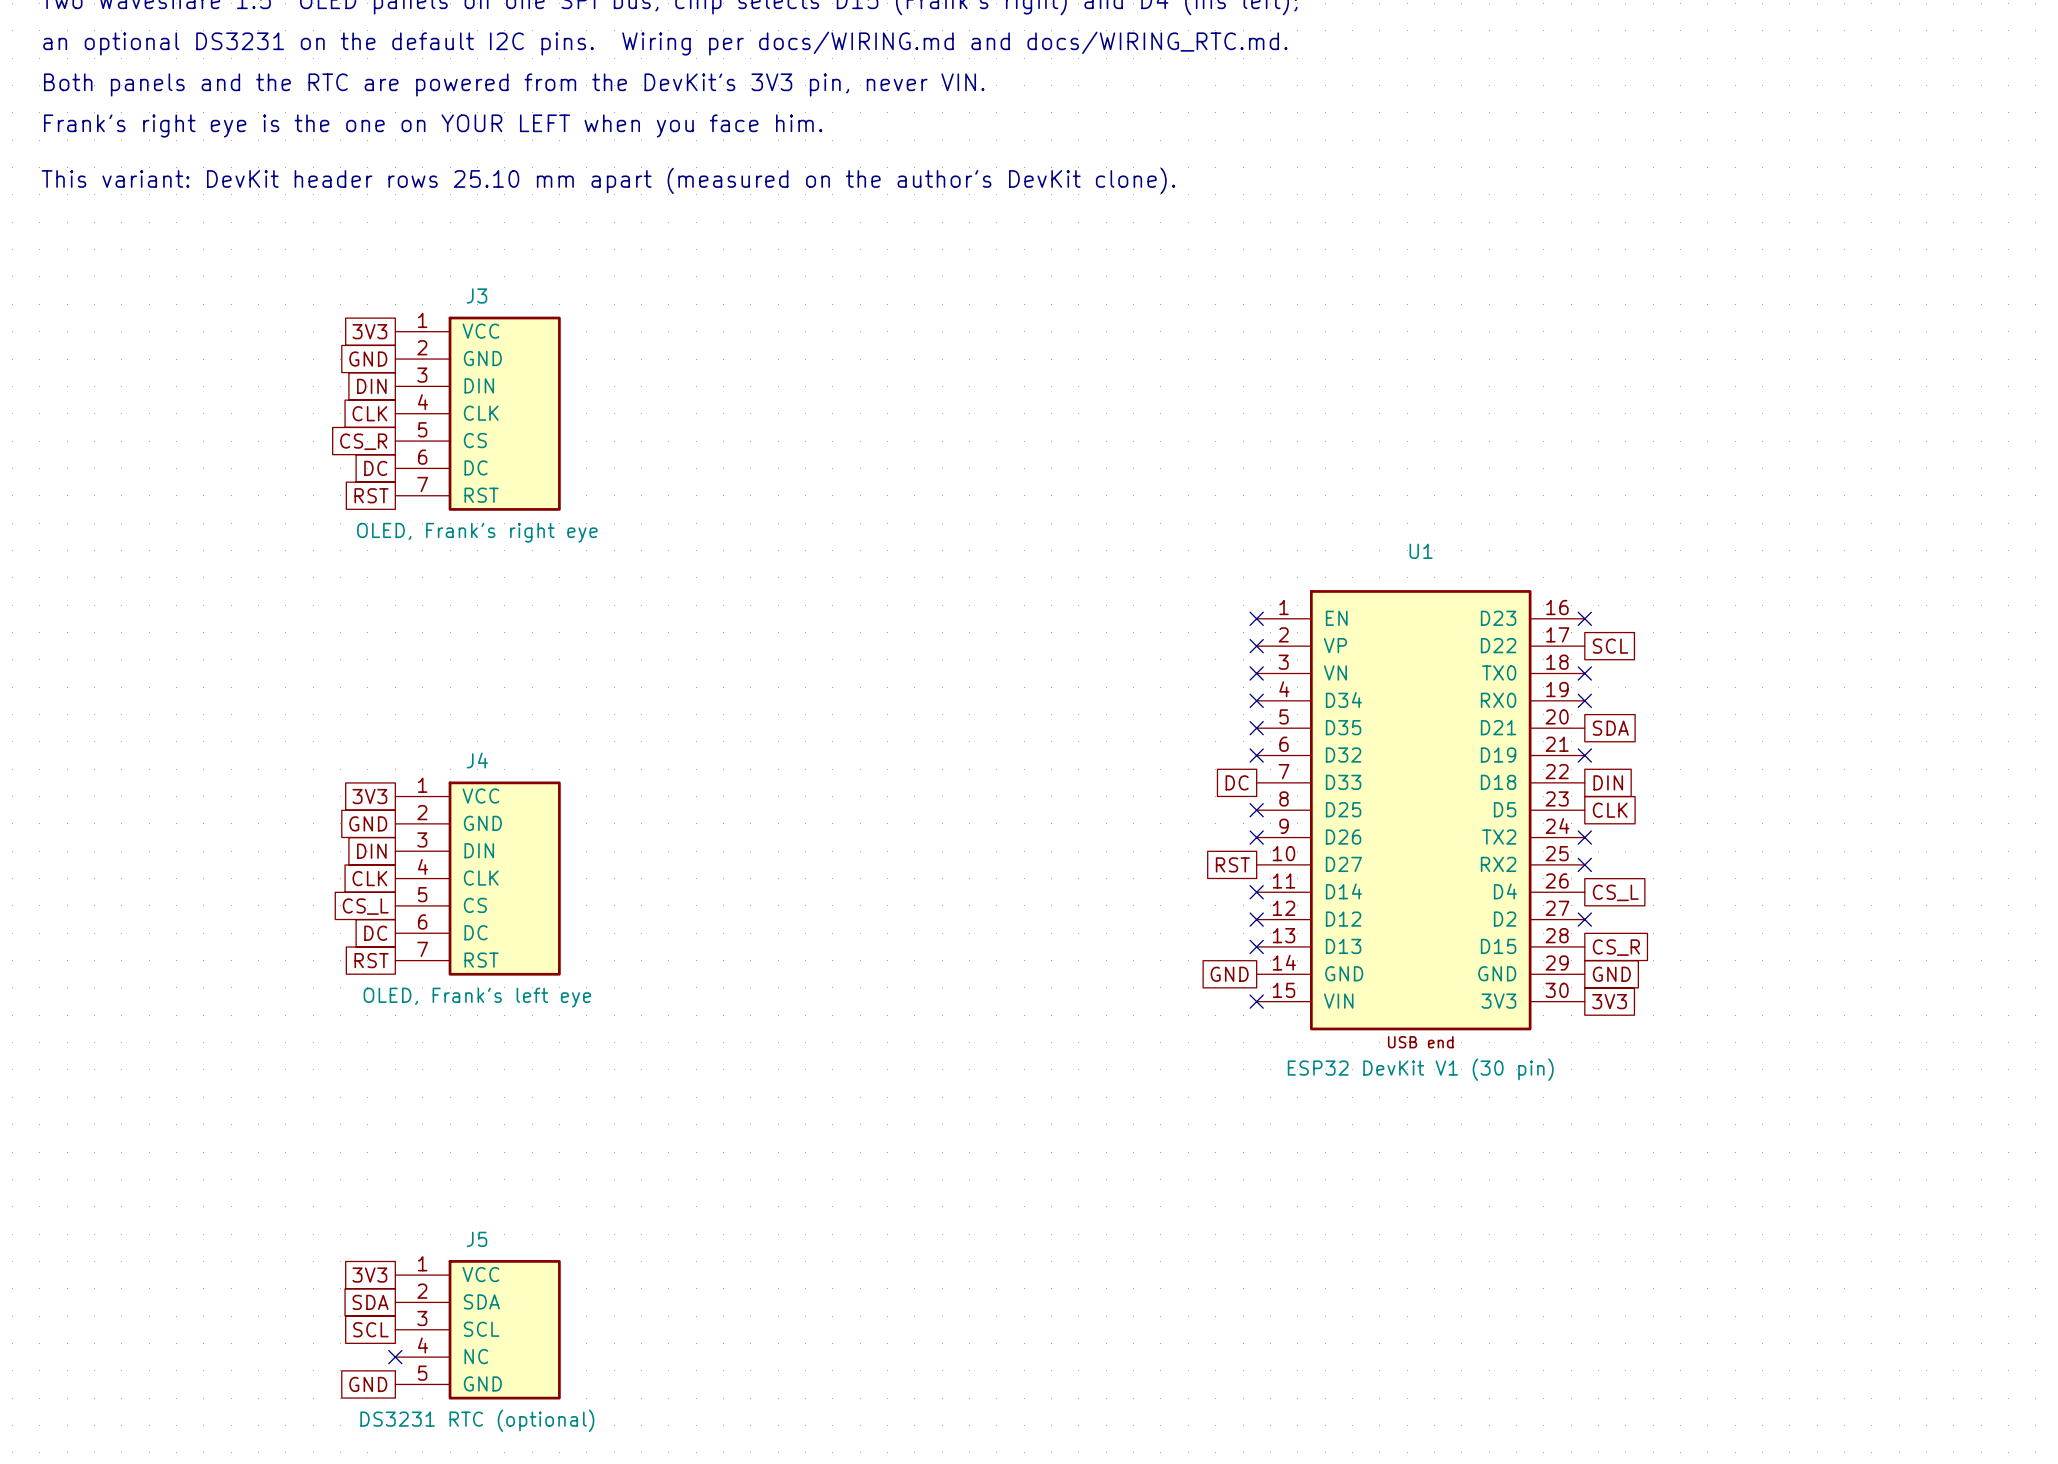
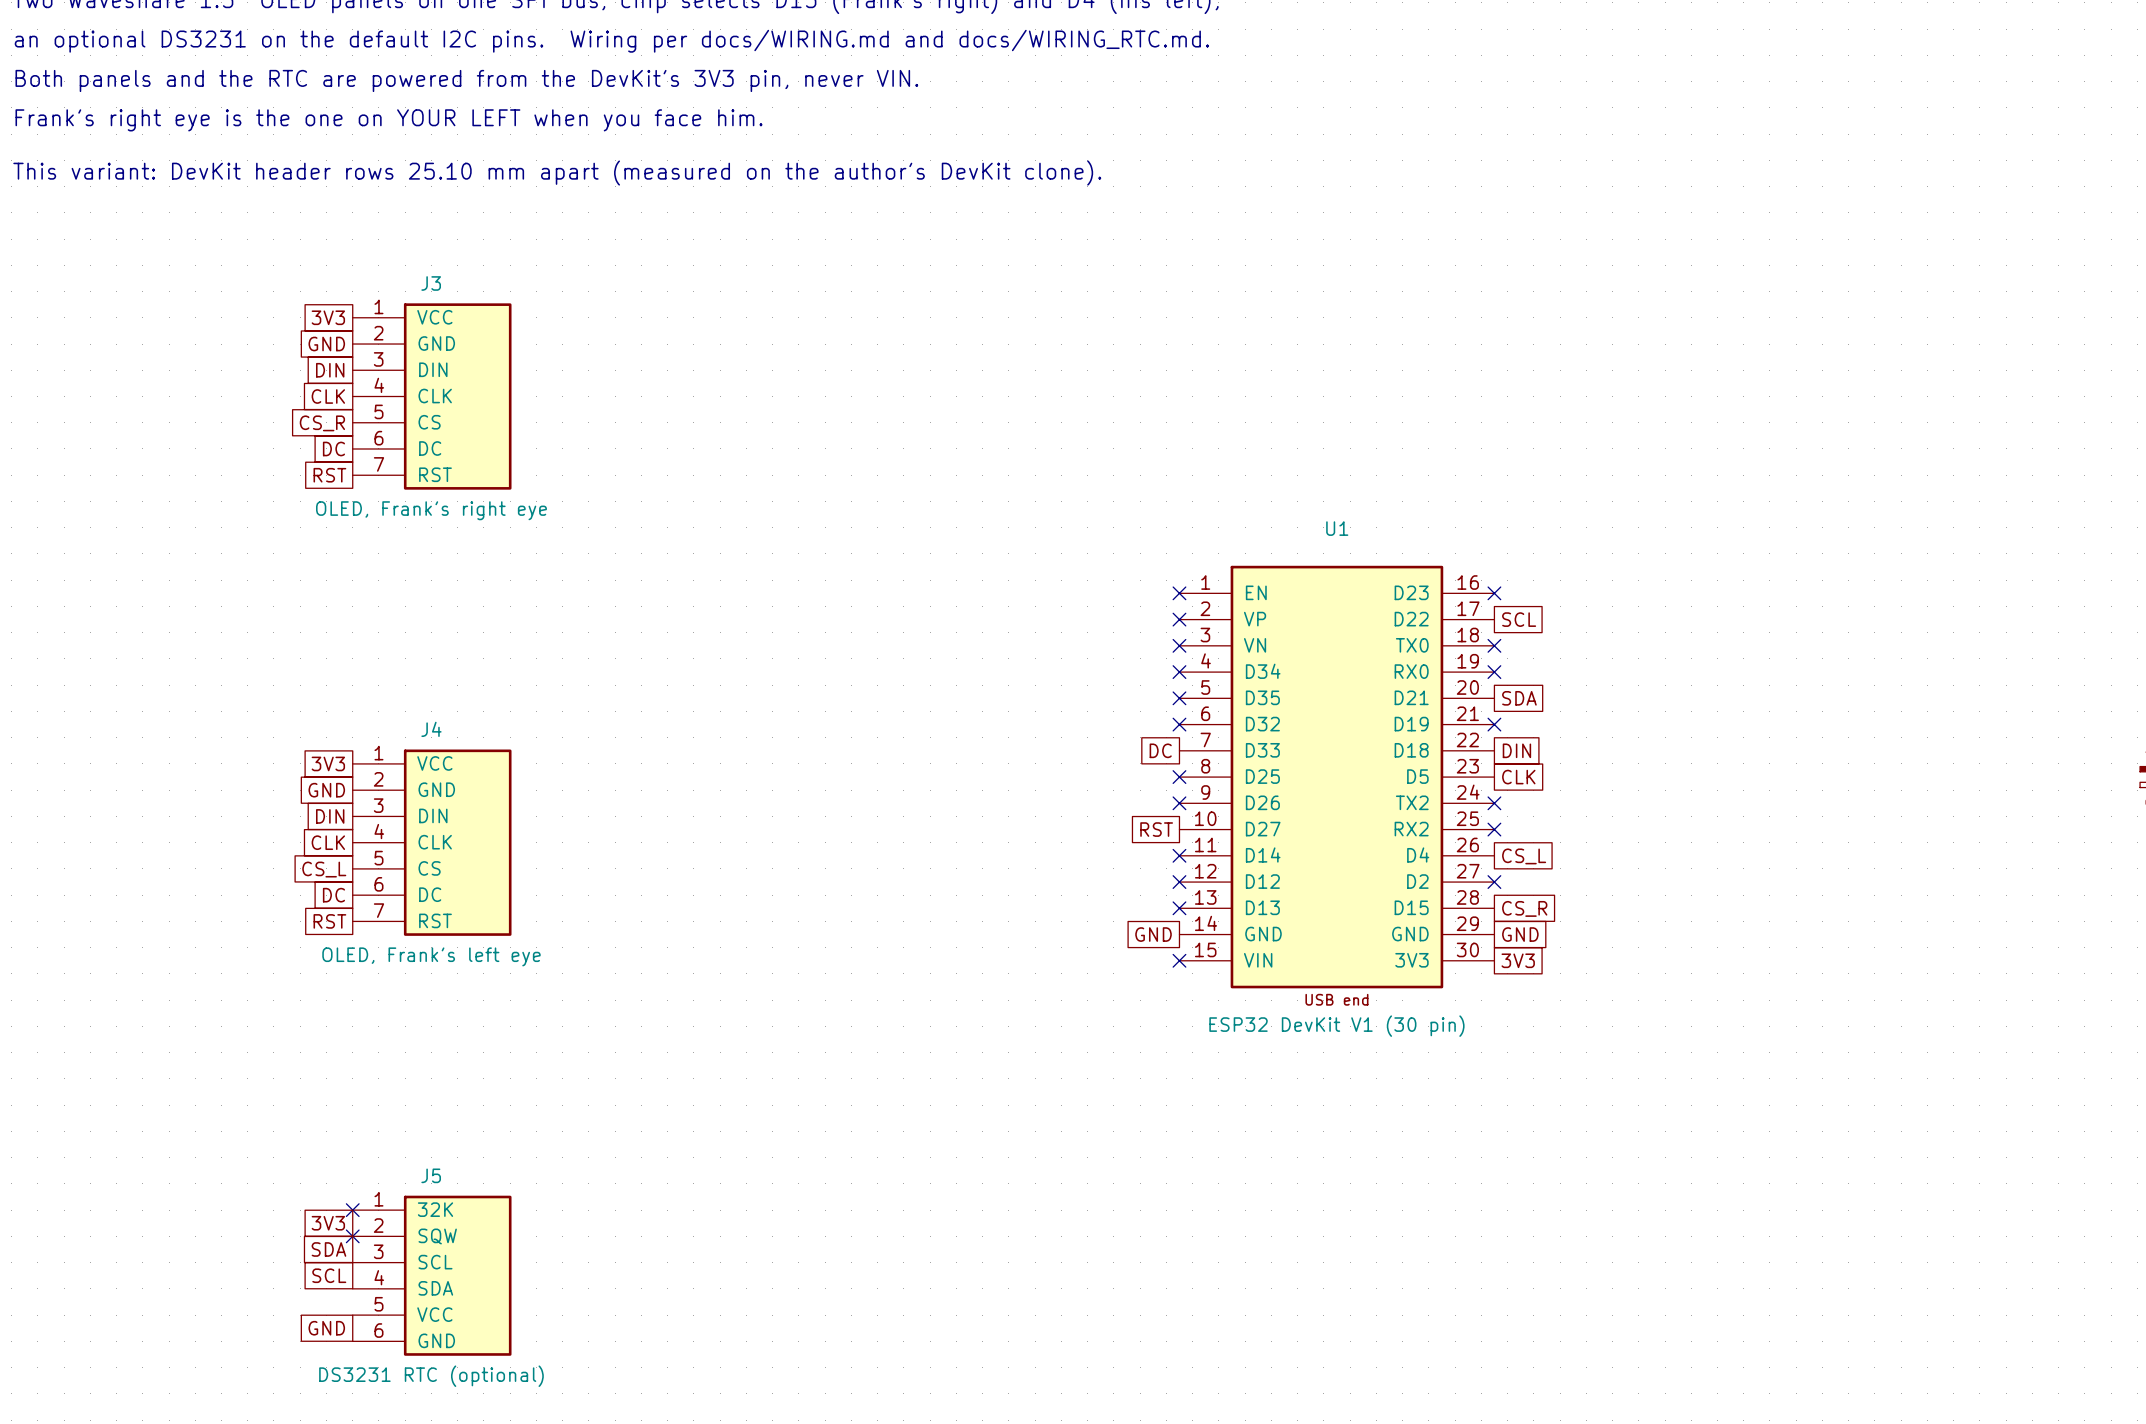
J5 symbol: [395, 1260, 561, 1400] -> [352, 1195, 512, 1356]
no-connect mark: none -> (352, 1210)
no-connect mark: none -> (352, 1236)
no-connect mark: (395, 1357) -> none

